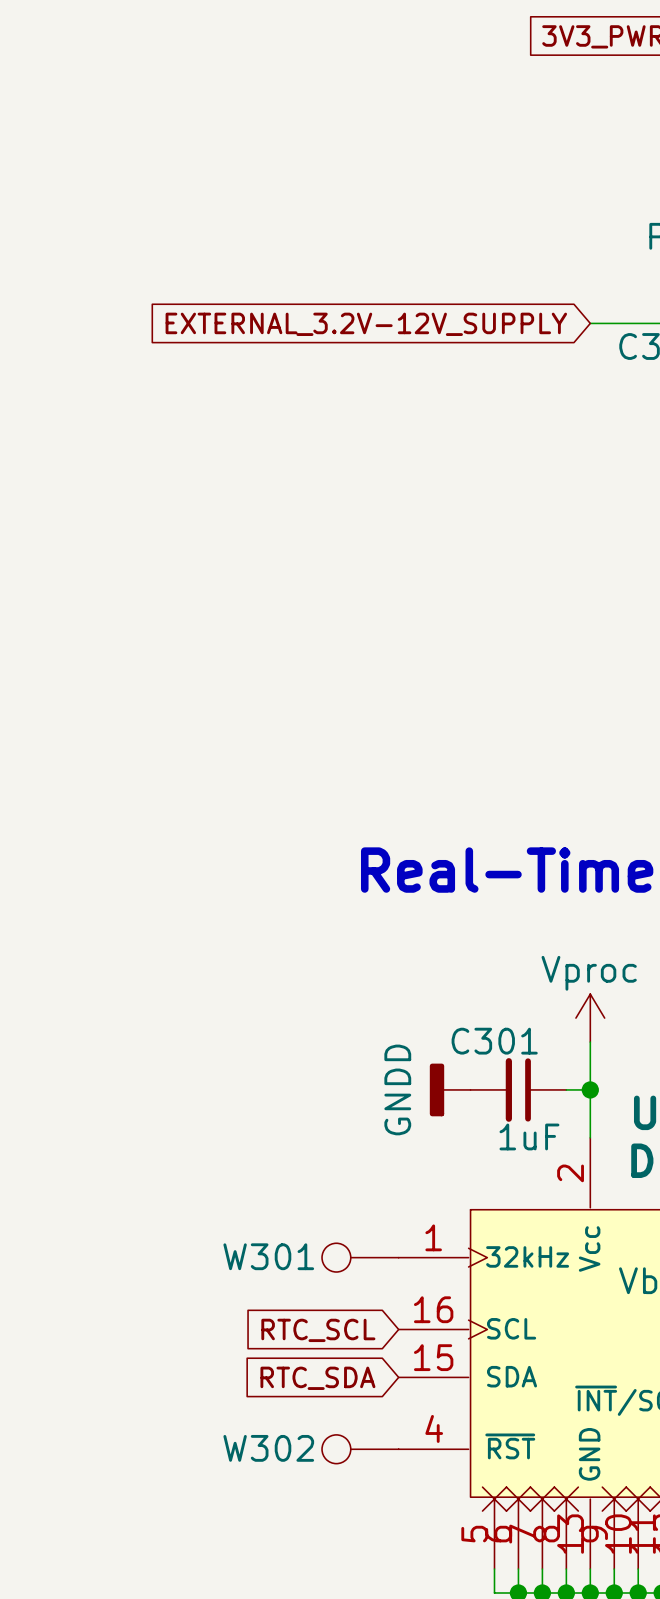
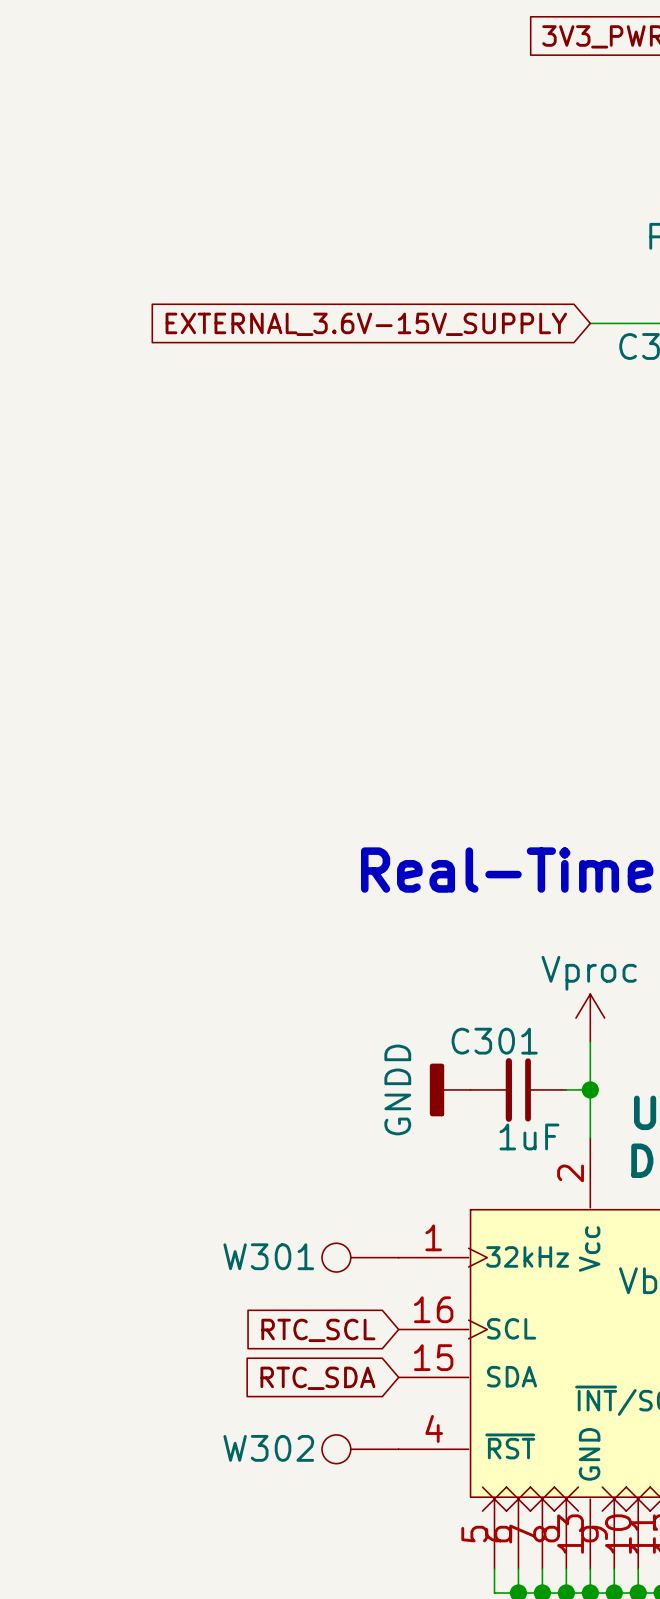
global label: EXTERNAL_3.2V-12V_SUPPLY (366, 324) -> EXTERNAL_3.6V-15V_SUPPLY (366, 324)

